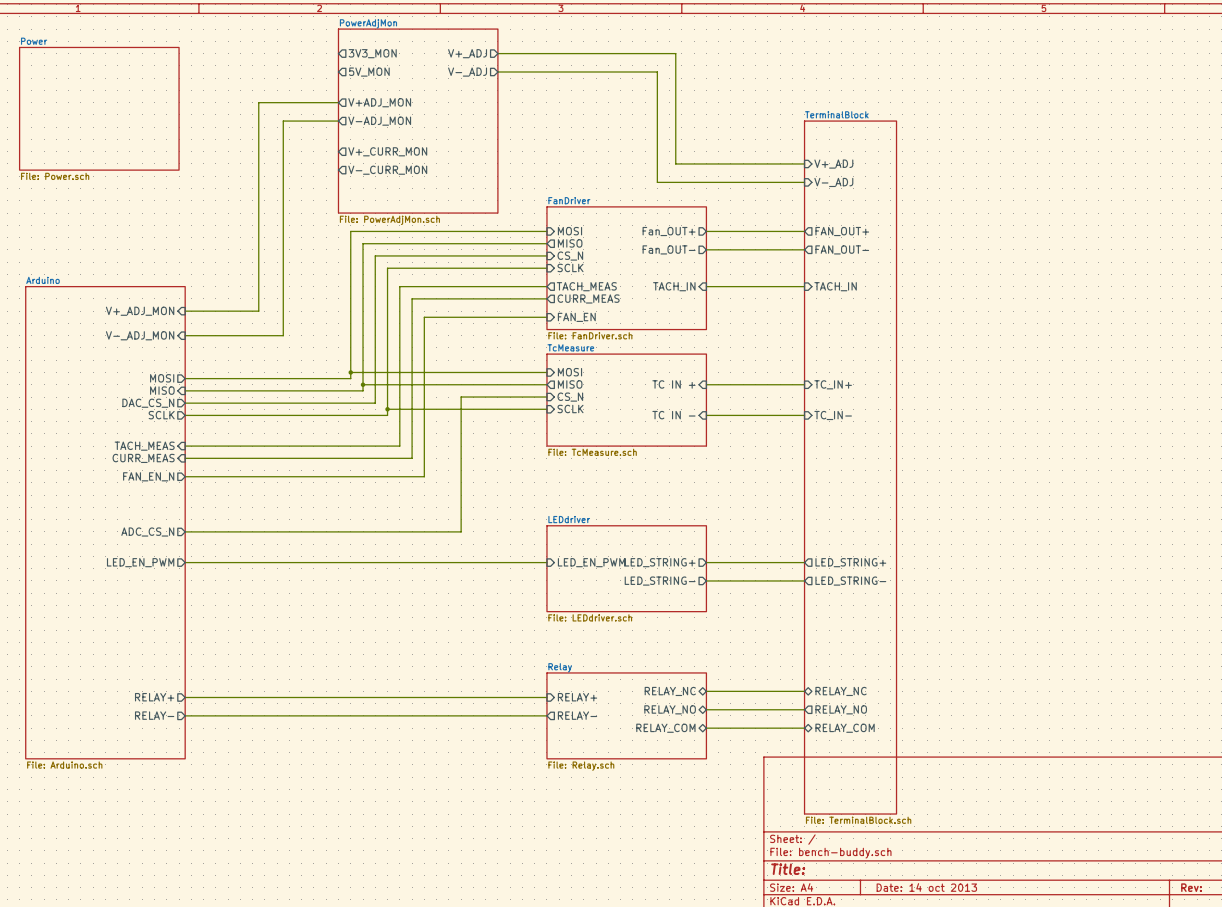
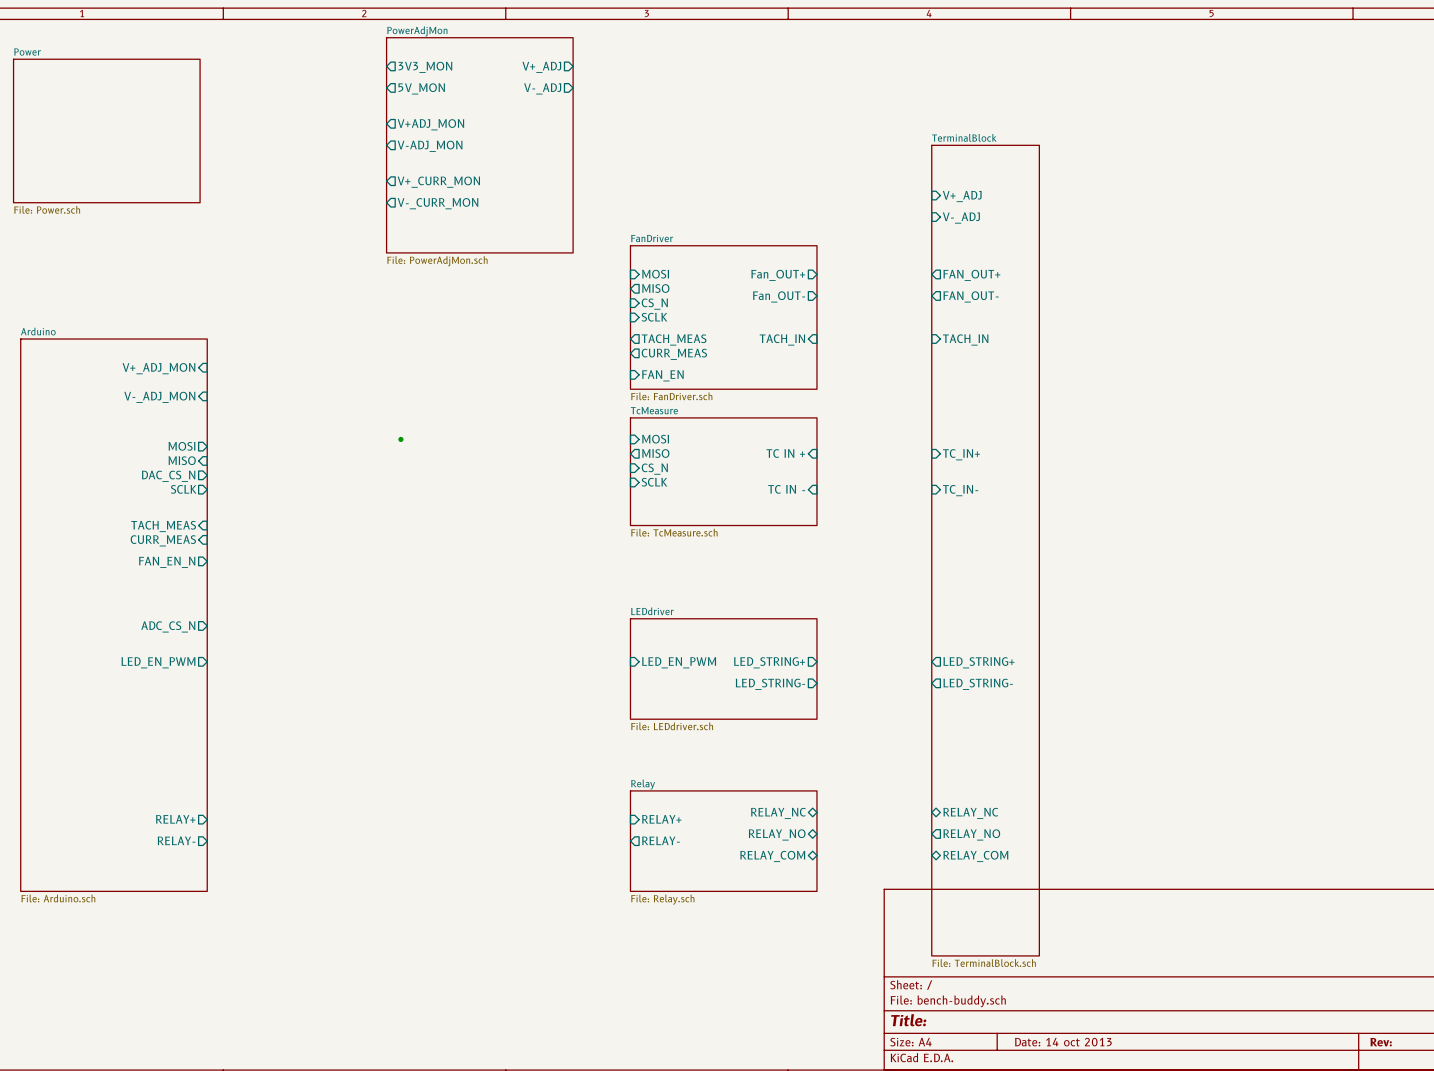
wire: (497, 53) (675, 53) (675, 163) (804, 163) -> none
wire: (497, 71) (657, 71) (657, 182) (804, 182) -> none
wire: (338, 102) (258, 102) (258, 311) (185, 311) -> none
wire: (338, 121) (283, 121) (283, 335) (185, 335) -> none
wire: (546, 231) (350, 231) (350, 378) (185, 378) -> none
wire: (706, 231) (804, 231) -> none
wire: (546, 243) (363, 243) (363, 390) (185, 390) -> none
wire: (706, 249) (804, 249) -> none
wire: (546, 255) (375, 255) (375, 403) (185, 403) -> none
wire: (546, 268) (387, 268) (387, 415) (185, 415) -> none
wire: (546, 286) (399, 286) (399, 446) (185, 446) -> none
wire: (706, 286) (804, 286) -> none
wire: (546, 298) (412, 298) (412, 458) (185, 458) -> none
wire: (546, 317) (424, 317) (424, 476) (185, 476) -> none
wire: (350, 372) (546, 372) -> none
wire: (363, 384) (546, 384) -> none
junction: (363, 384) -> none
wire: (706, 384) (804, 384) -> none
wire: (546, 397) (461, 397) (461, 531) (185, 531) -> none
wire: (387, 409) (546, 409) -> none
junction: (387, 409) -> none
wire: (706, 415) (804, 415) -> none
wire: (185, 562) (546, 562) -> none
wire: (706, 562) (804, 562) -> none
wire: (706, 580) (804, 580) -> none
wire: (706, 691) (804, 691) -> none
wire: (185, 697) (546, 697) -> none
wire: (706, 709) (804, 709) -> none
wire: (185, 715) (546, 715) -> none
wire: (706, 728) (804, 728) -> none

